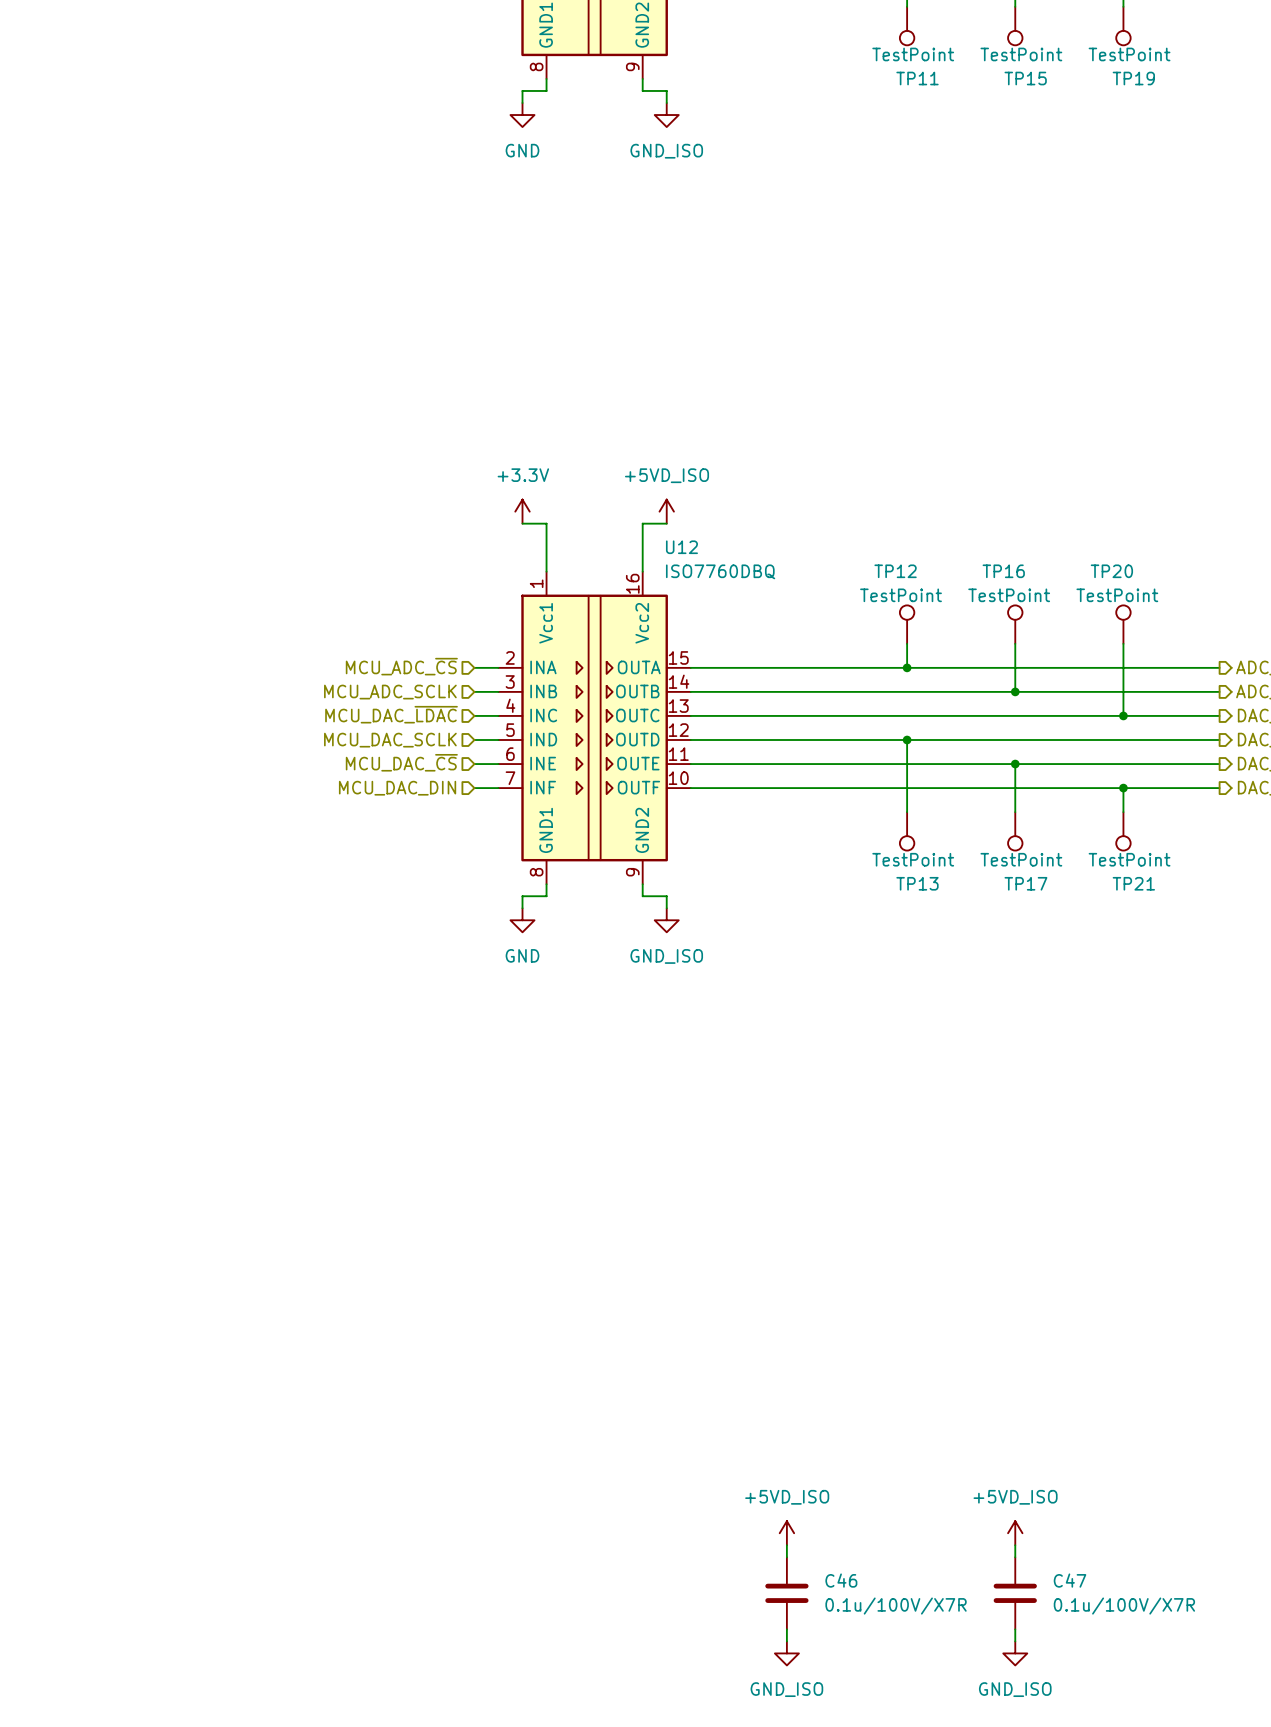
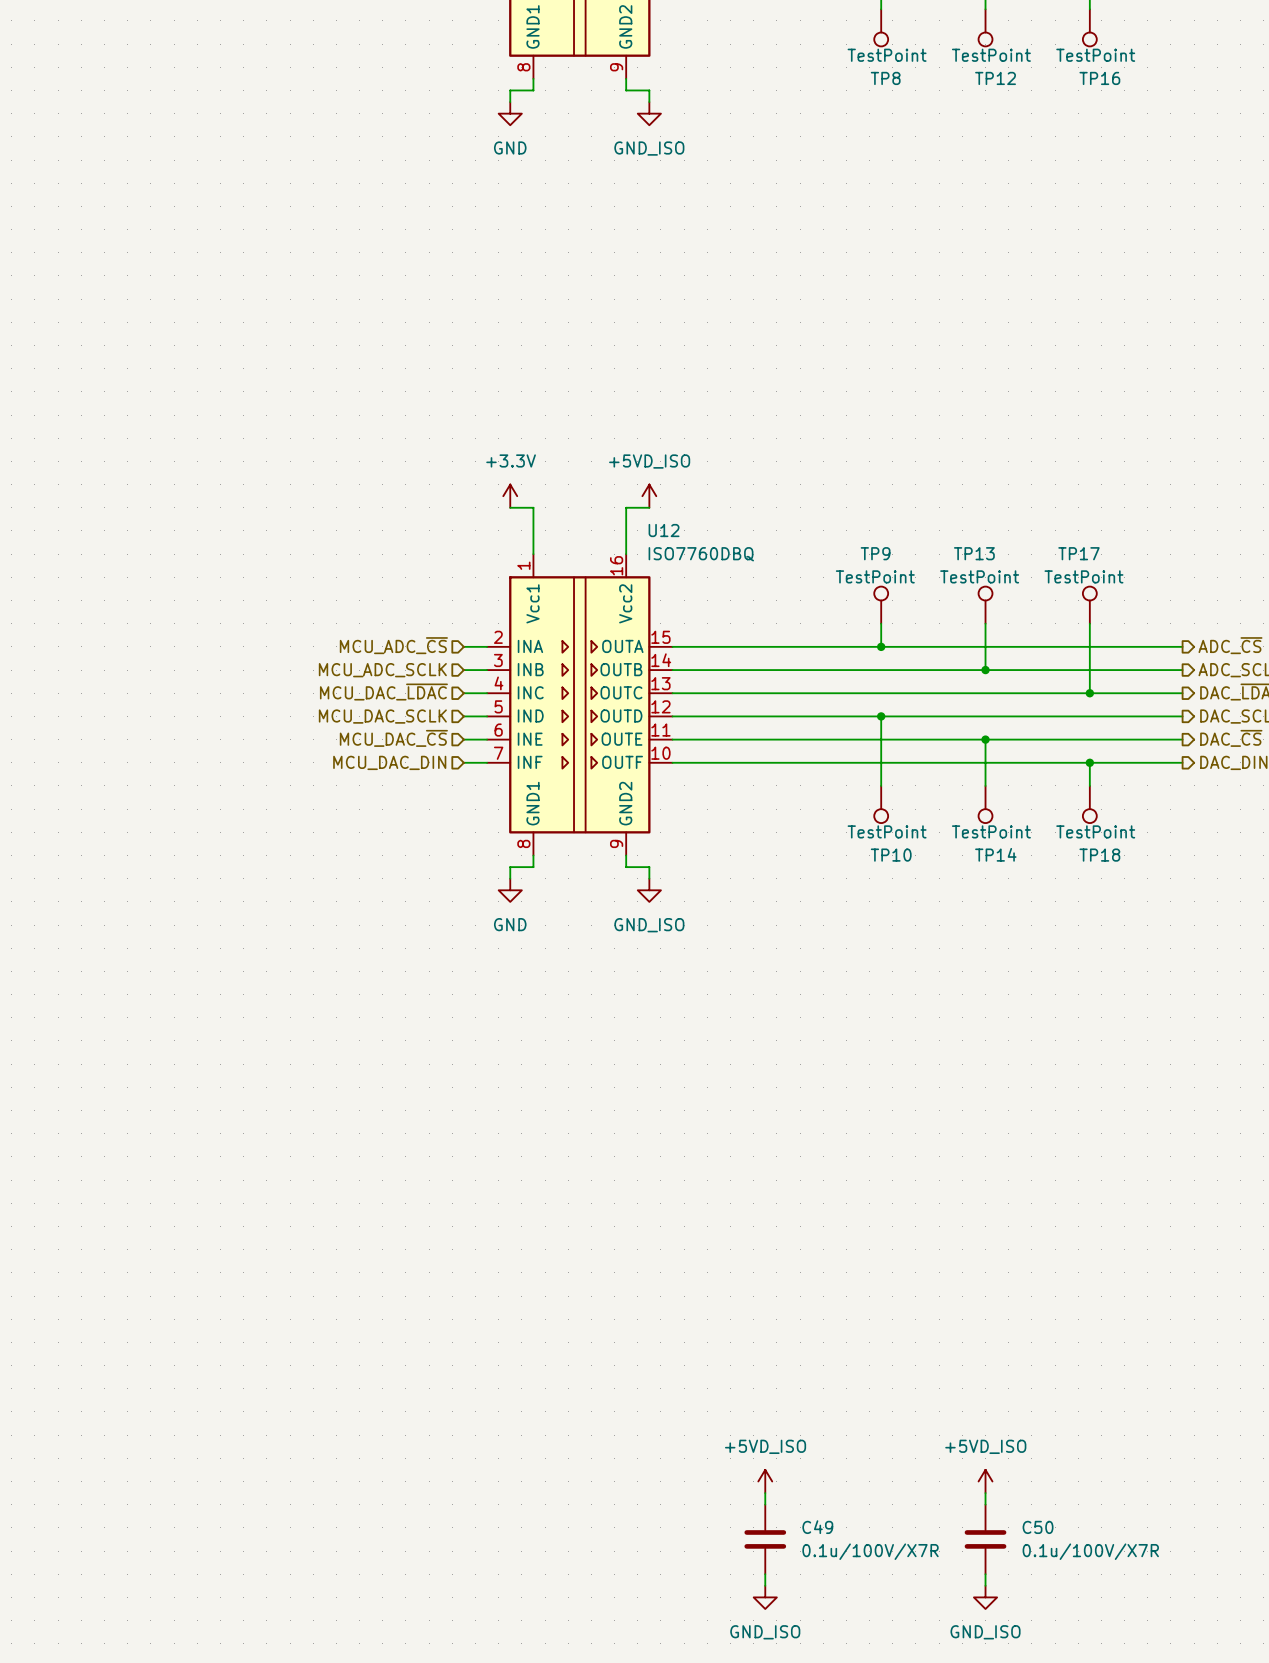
TP11 name: TP11 (917, 78) -> TP8 (885, 78)
TP15 name: TP15 (1025, 78) -> TP12 (995, 78)
TP19 name: TP19 (1133, 78) -> TP16 (1099, 78)
TP12 name: TP12 (895, 571) -> TP9 (875, 553)
TP16 name: TP16 (1003, 571) -> TP13 (974, 553)
TP20 name: TP20 (1111, 571) -> TP17 (1078, 553)
TP13 name: TP13 (917, 883) -> TP10 (891, 855)
TP17 name: TP17 (1025, 883) -> TP14 (995, 854)
TP21 name: TP21 (1133, 883) -> TP18 (1099, 855)
C46 name: C46 (841, 1580) -> C49 (817, 1527)
C47 name: C47 (1070, 1580) -> C50 (1038, 1527)

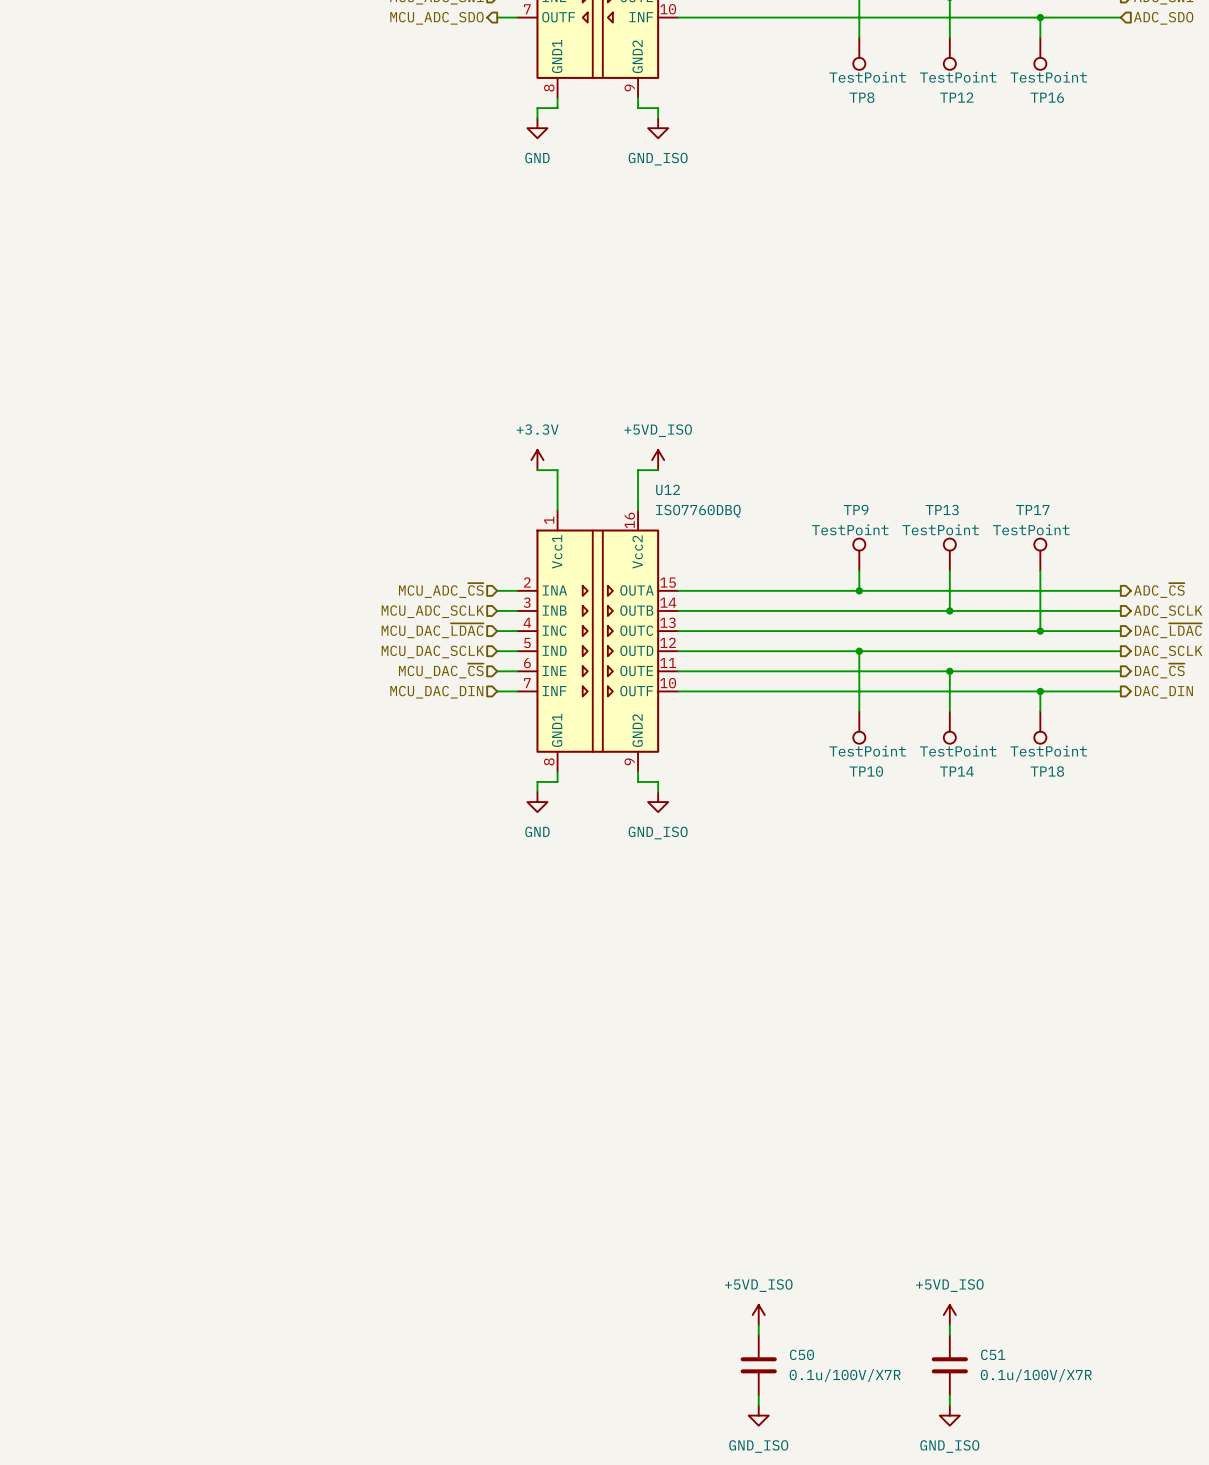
C49 name: C49 (817, 1527) -> C50 (801, 1354)
C50 name: C50 (1038, 1527) -> C51 (993, 1354)

